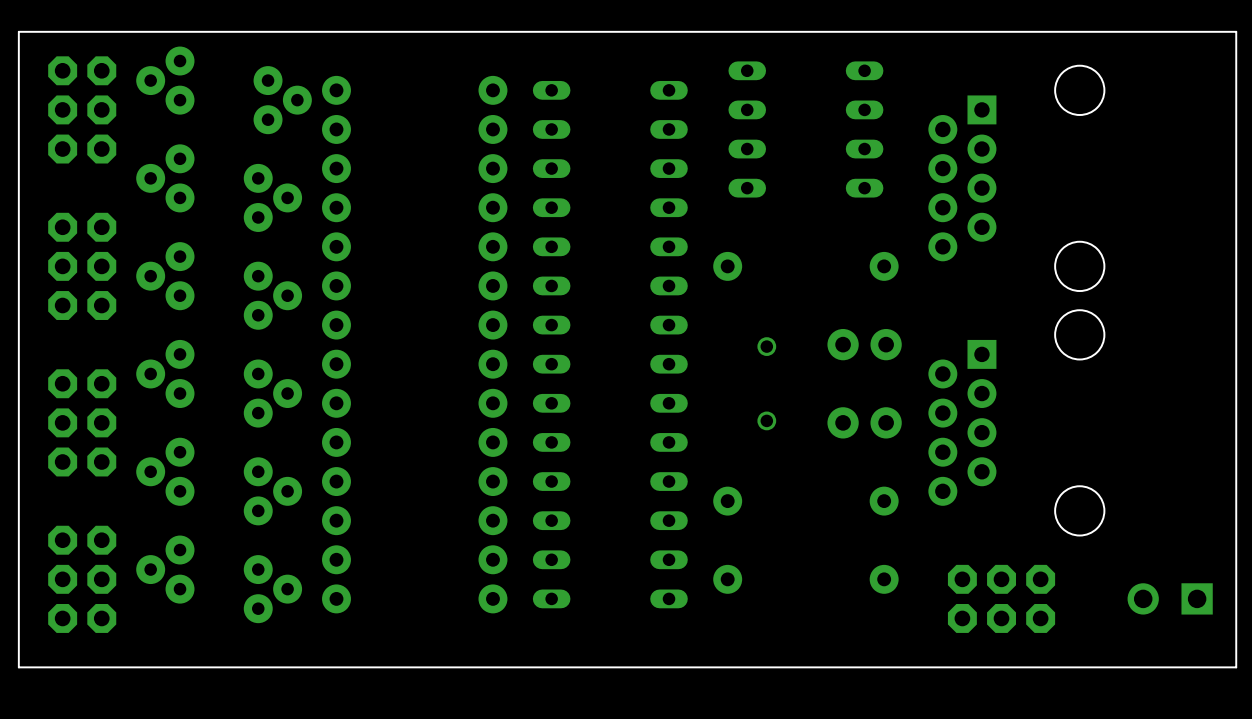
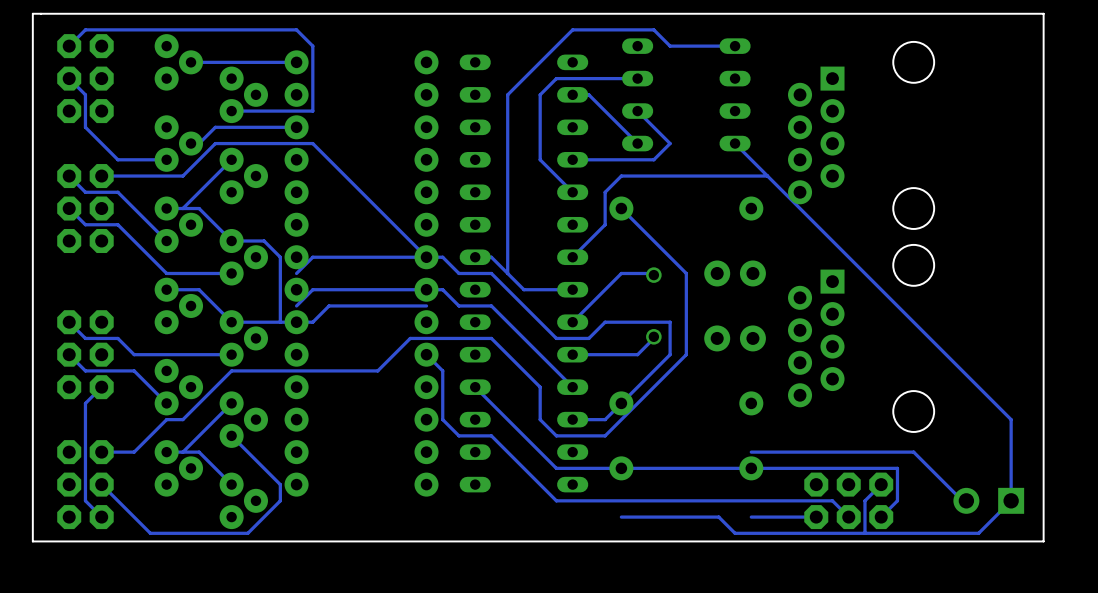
track: none -> (69, 46) (85, 29) (296, 29) (312, 46) (312, 111) (231, 111)
track: none -> (735, 46) (670, 46) (653, 29) (572, 29) (507, 94) (507, 273)
part rotation: 0° (165, 80) -> 180° (178, 62)
track: none -> (296, 62) (191, 62)
part position: (282, 100) -> (243, 94)
track: none -> (69, 78) (85, 94) (85, 127) (117, 159) (166, 159)
track: none -> (637, 78) (556, 78) (540, 94) (540, 159) (572, 192)
track: none -> (572, 94) (588, 94) (637, 143)
track: none -> (637, 111) (670, 143) (653, 159) (572, 159)
track: none -> (296, 127) (215, 127) (199, 143) (191, 143)
part rotation: 0° (165, 178) -> 180° (178, 143)
track: none -> (735, 143) (1011, 419) (1011, 500) (978, 533) (735, 533) (718, 517) (621, 517)
part position: (272, 197) -> (243, 176)
track: none -> (231, 159) (182, 208)
track: none -> (69, 176) (85, 192) (117, 192) (166, 241)
track: none -> (101, 176) (182, 176) (215, 143) (312, 143) (426, 257)
track: none -> (767, 176) (621, 176) (605, 192) (605, 224) (572, 257)
track: none -> (69, 208) (85, 224) (117, 224) (166, 273) (231, 273)
track: none -> (166, 208) (199, 208) (231, 241) (264, 241) (280, 257) (280, 322)
track: none -> (621, 208) (686, 273) (686, 354) (605, 435) (556, 435) (540, 419) (540, 387) (491, 338) (410, 338) (377, 370) (231, 370) (182, 419) (166, 419) (134, 452) (101, 452)
part rotation: 0° (165, 276) -> 180° (178, 224)
part position: (272, 295) -> (243, 257)
track: none -> (475, 257) (491, 257) (523, 289) (572, 289)
track: none -> (296, 273) (312, 257) (442, 257) (458, 273) (491, 273) (556, 338) (588, 338) (605, 322) (670, 322) (670, 354) (605, 419) (572, 419)
track: none -> (653, 275) (653, 273) (621, 273) (572, 322)
track: none -> (166, 289) (199, 289) (231, 322) (312, 322) (329, 305) (426, 305)
part rotation: 0° (165, 373) -> 180° (178, 305)
track: none -> (296, 305) (312, 289) (442, 289) (458, 305) (491, 305) (572, 387)
part position: (272, 393) -> (243, 338)
track: none -> (69, 322) (85, 338) (117, 338) (134, 354) (231, 354)
track: none -> (653, 336) (637, 354) (572, 354)
part position: (82, 422) -> (85, 354)
track: none -> (69, 354) (85, 370) (134, 370) (166, 403)
track: none -> (426, 354) (442, 370) (442, 419) (458, 435) (491, 435) (556, 500) (832, 500) (848, 517)
part rotation: 0° (165, 471) -> 180° (178, 387)
track: none -> (101, 387) (85, 403) (85, 500) (101, 517)
track: none -> (475, 387) (556, 468) (897, 468) (897, 500) (881, 517)
part position: (272, 491) -> (243, 419)
track: none -> (231, 403) (182, 452)
track: none -> (231, 435) (280, 484) (280, 500) (247, 533) (150, 533) (101, 484)
track: none -> (166, 452) (199, 452) (231, 484)
track: none -> (751, 452) (913, 452) (962, 500) (966, 500)
part rotation: 0° (165, 569) -> 180° (178, 468)
part position: (82, 579) -> (85, 484)
part position: (272, 589) -> (243, 500)
part position: (1001, 598) -> (848, 500)
track: none -> (881, 484) (864, 500) (864, 533)
part position: (1170, 598) -> (988, 500)
track: none -> (816, 517) (751, 517)

